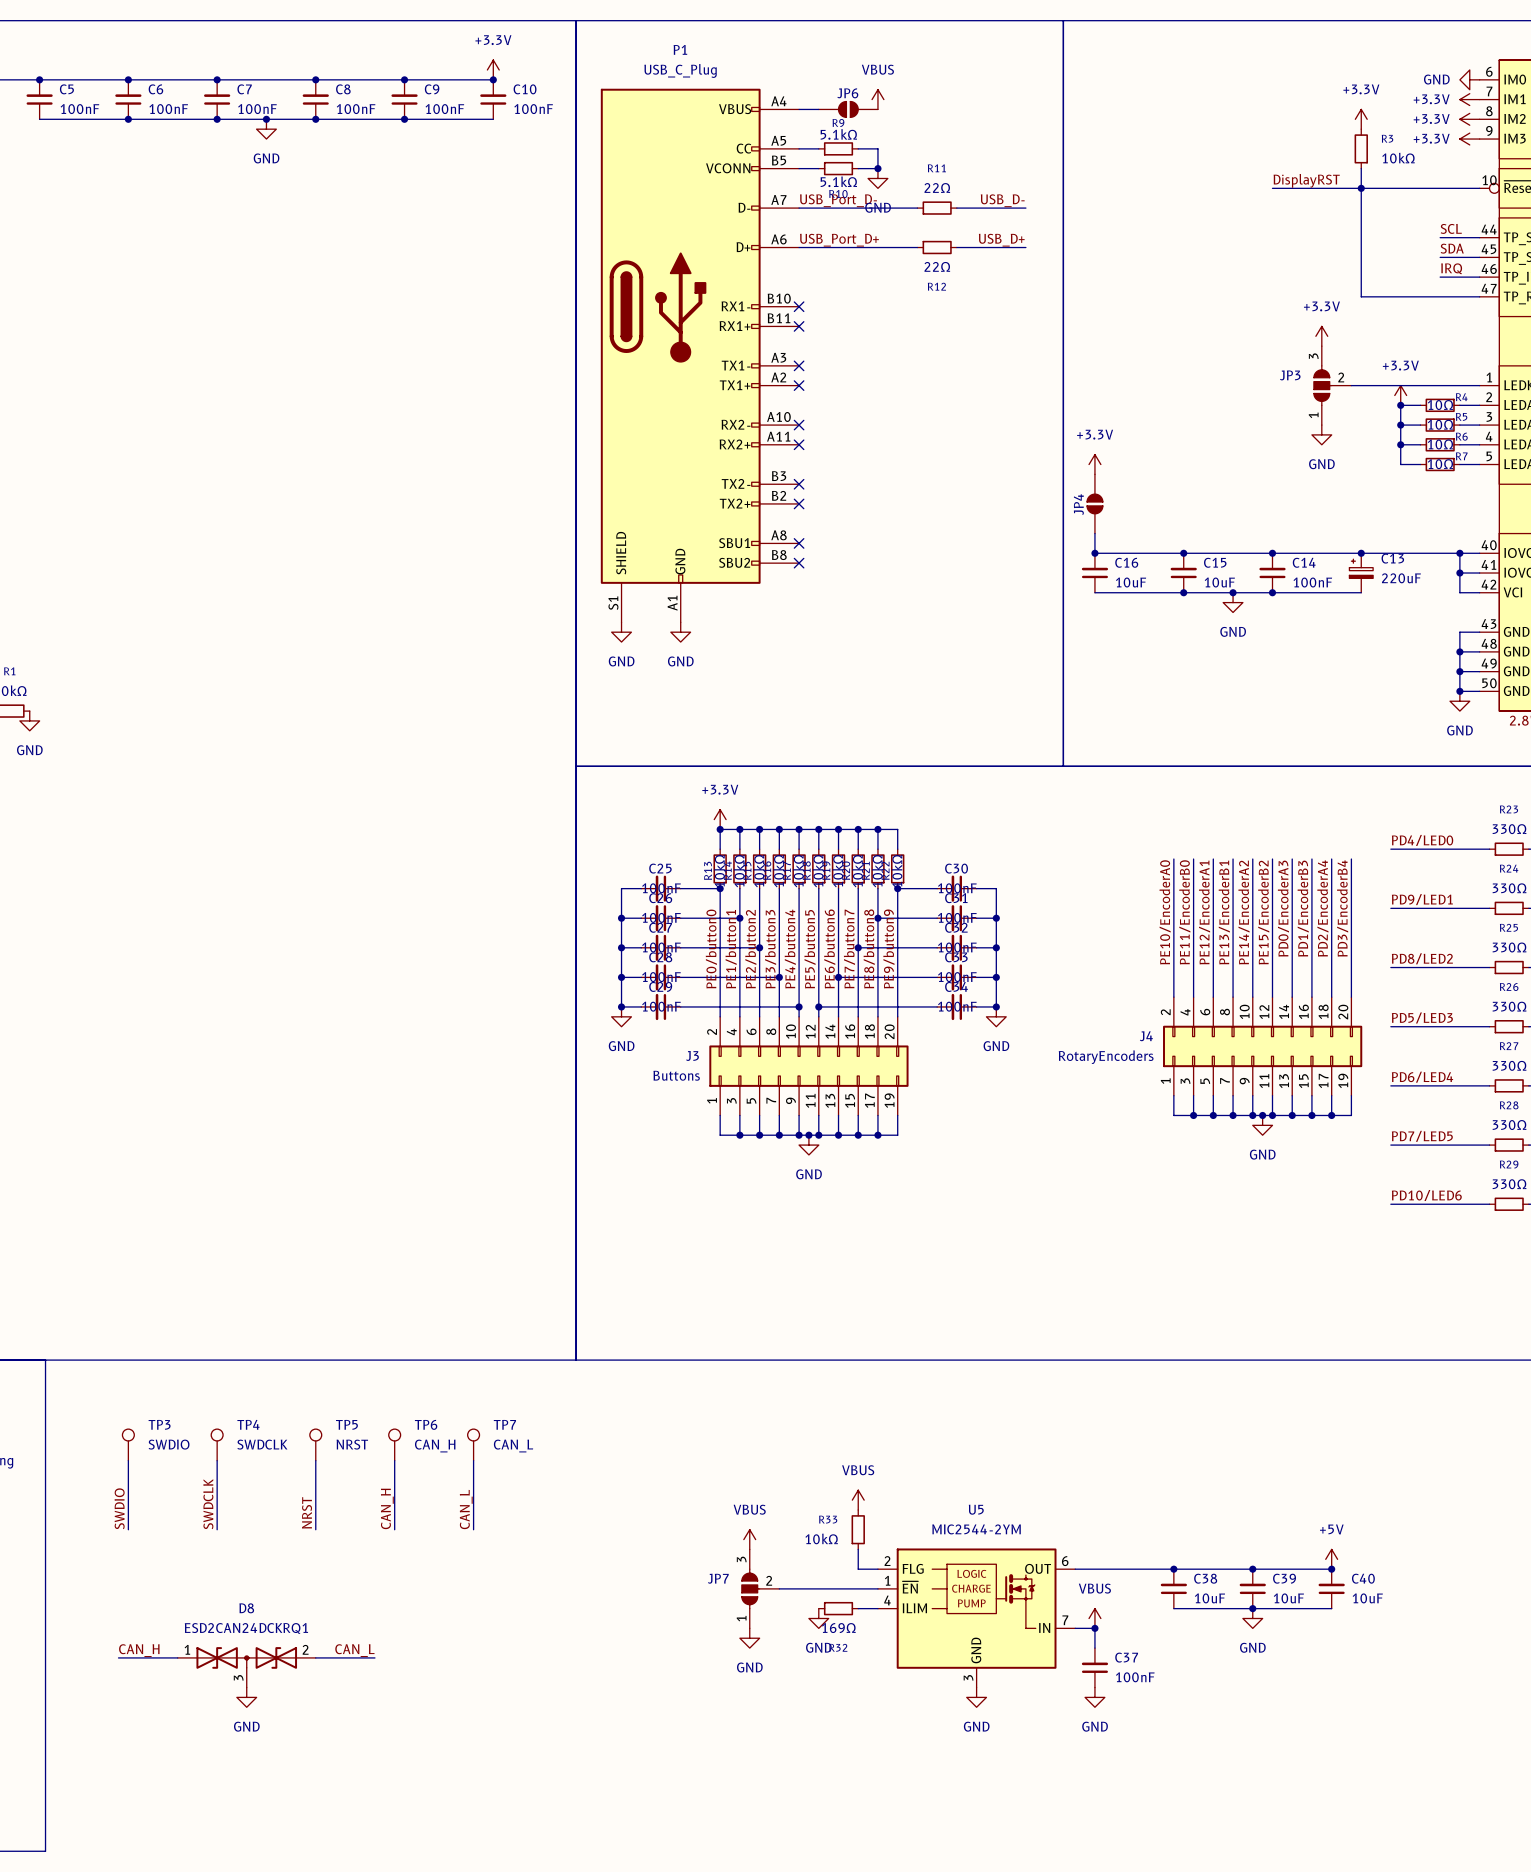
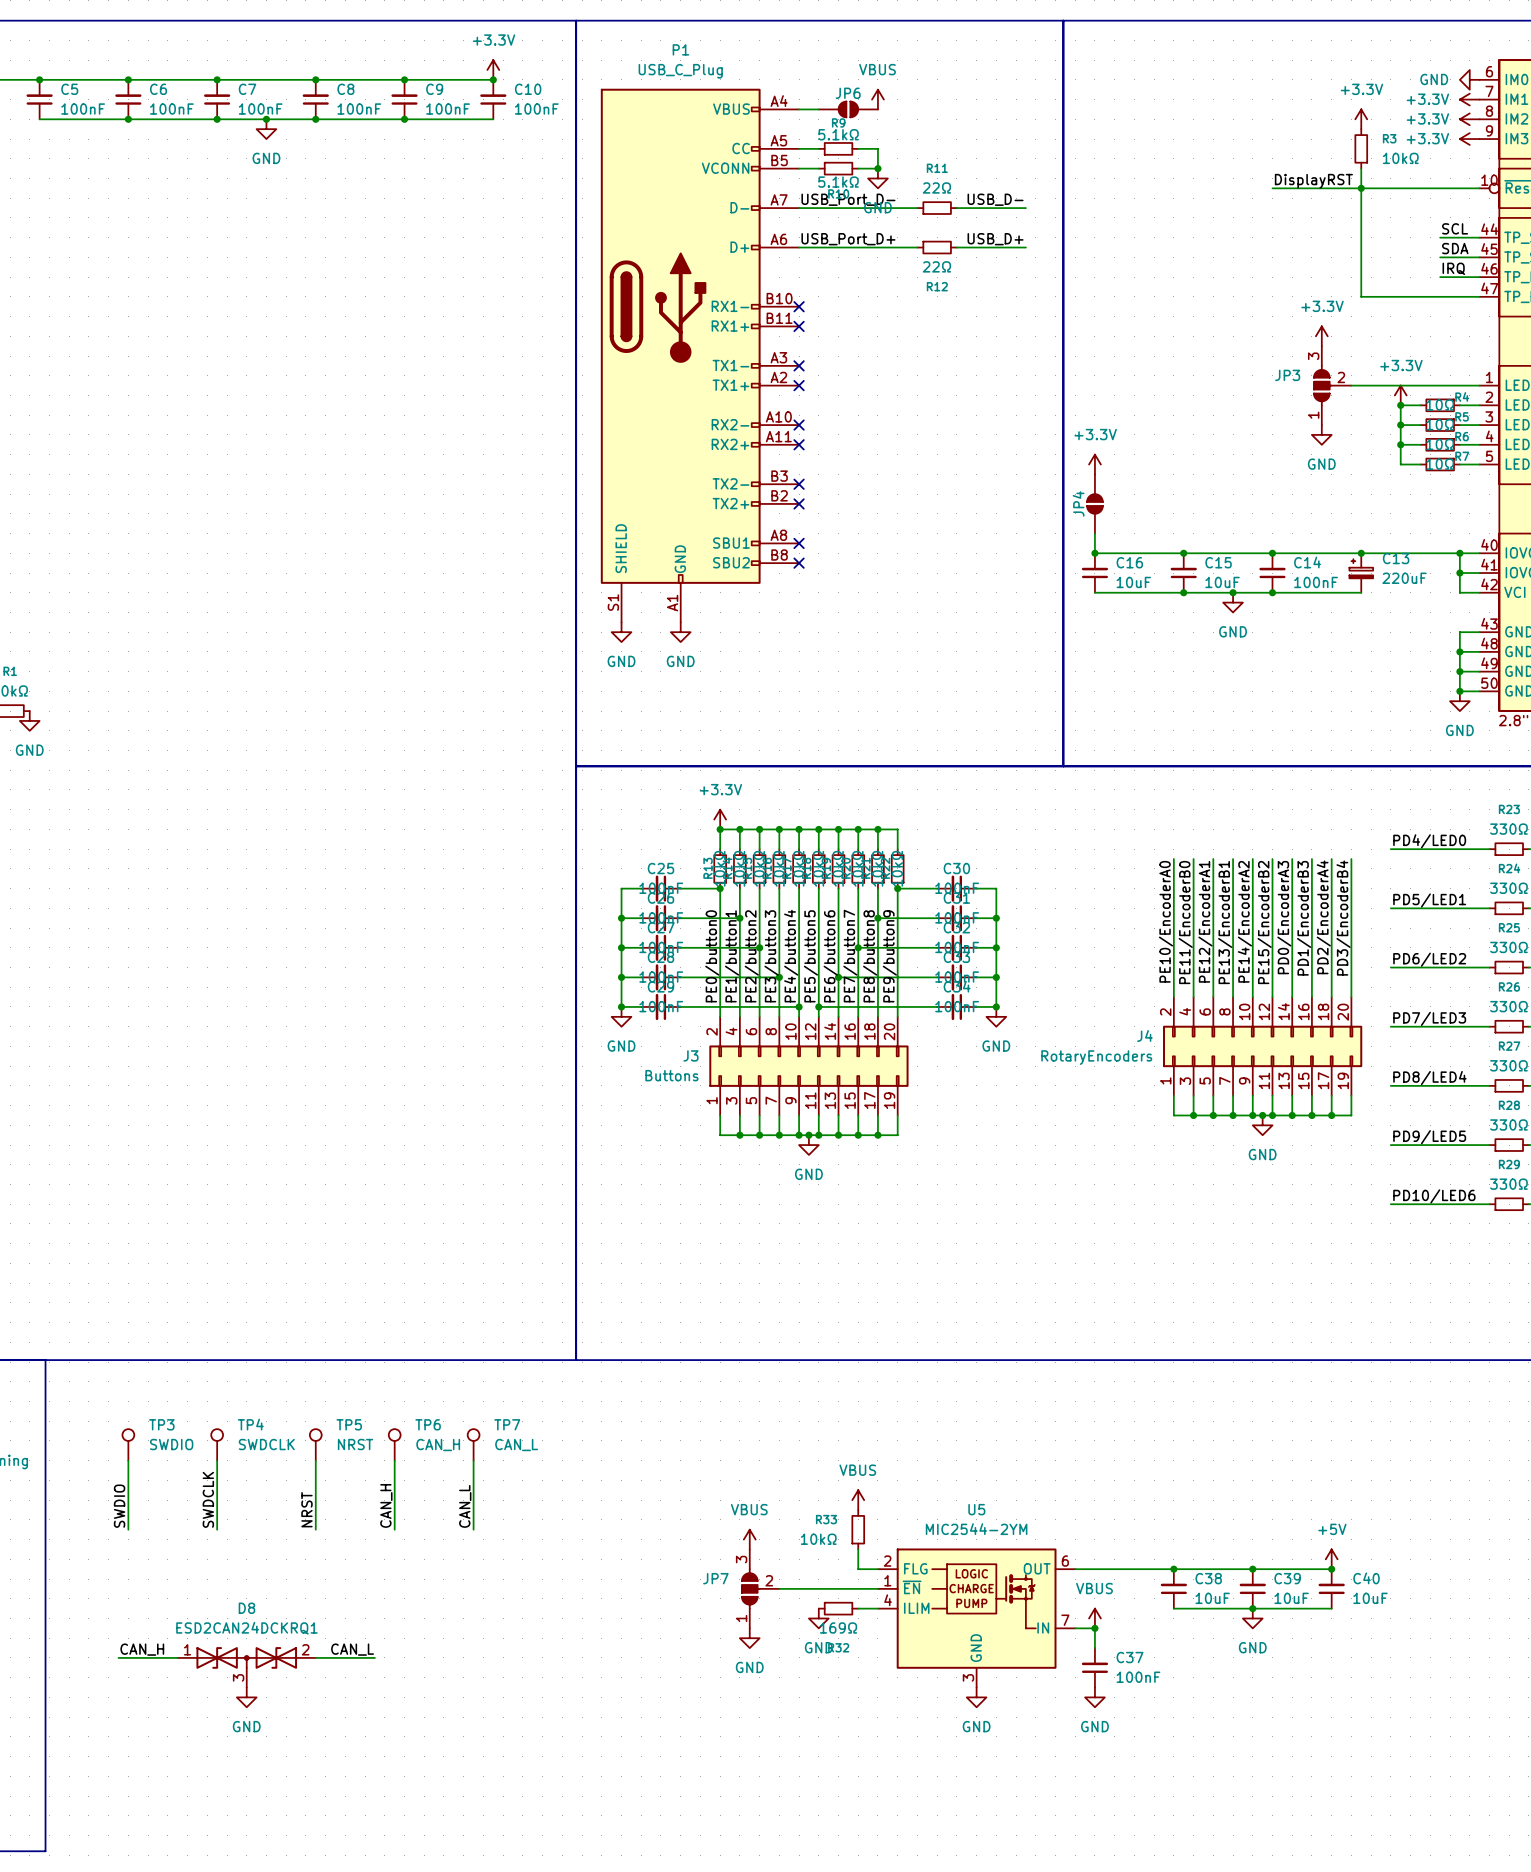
label: PD9/LED1 (1422, 899) -> PD5/LED1 (1429, 900)
label: PD8/LED2 (1422, 958) -> PD6/LED2 (1429, 959)
label: PD5/LED3 (1422, 1017) -> PD7/LED3 (1429, 1018)
label: PD6/LED4 (1422, 1077) -> PD8/LED4 (1429, 1078)
label: PD7/LED5 (1422, 1136) -> PD9/LED5 (1429, 1137)

